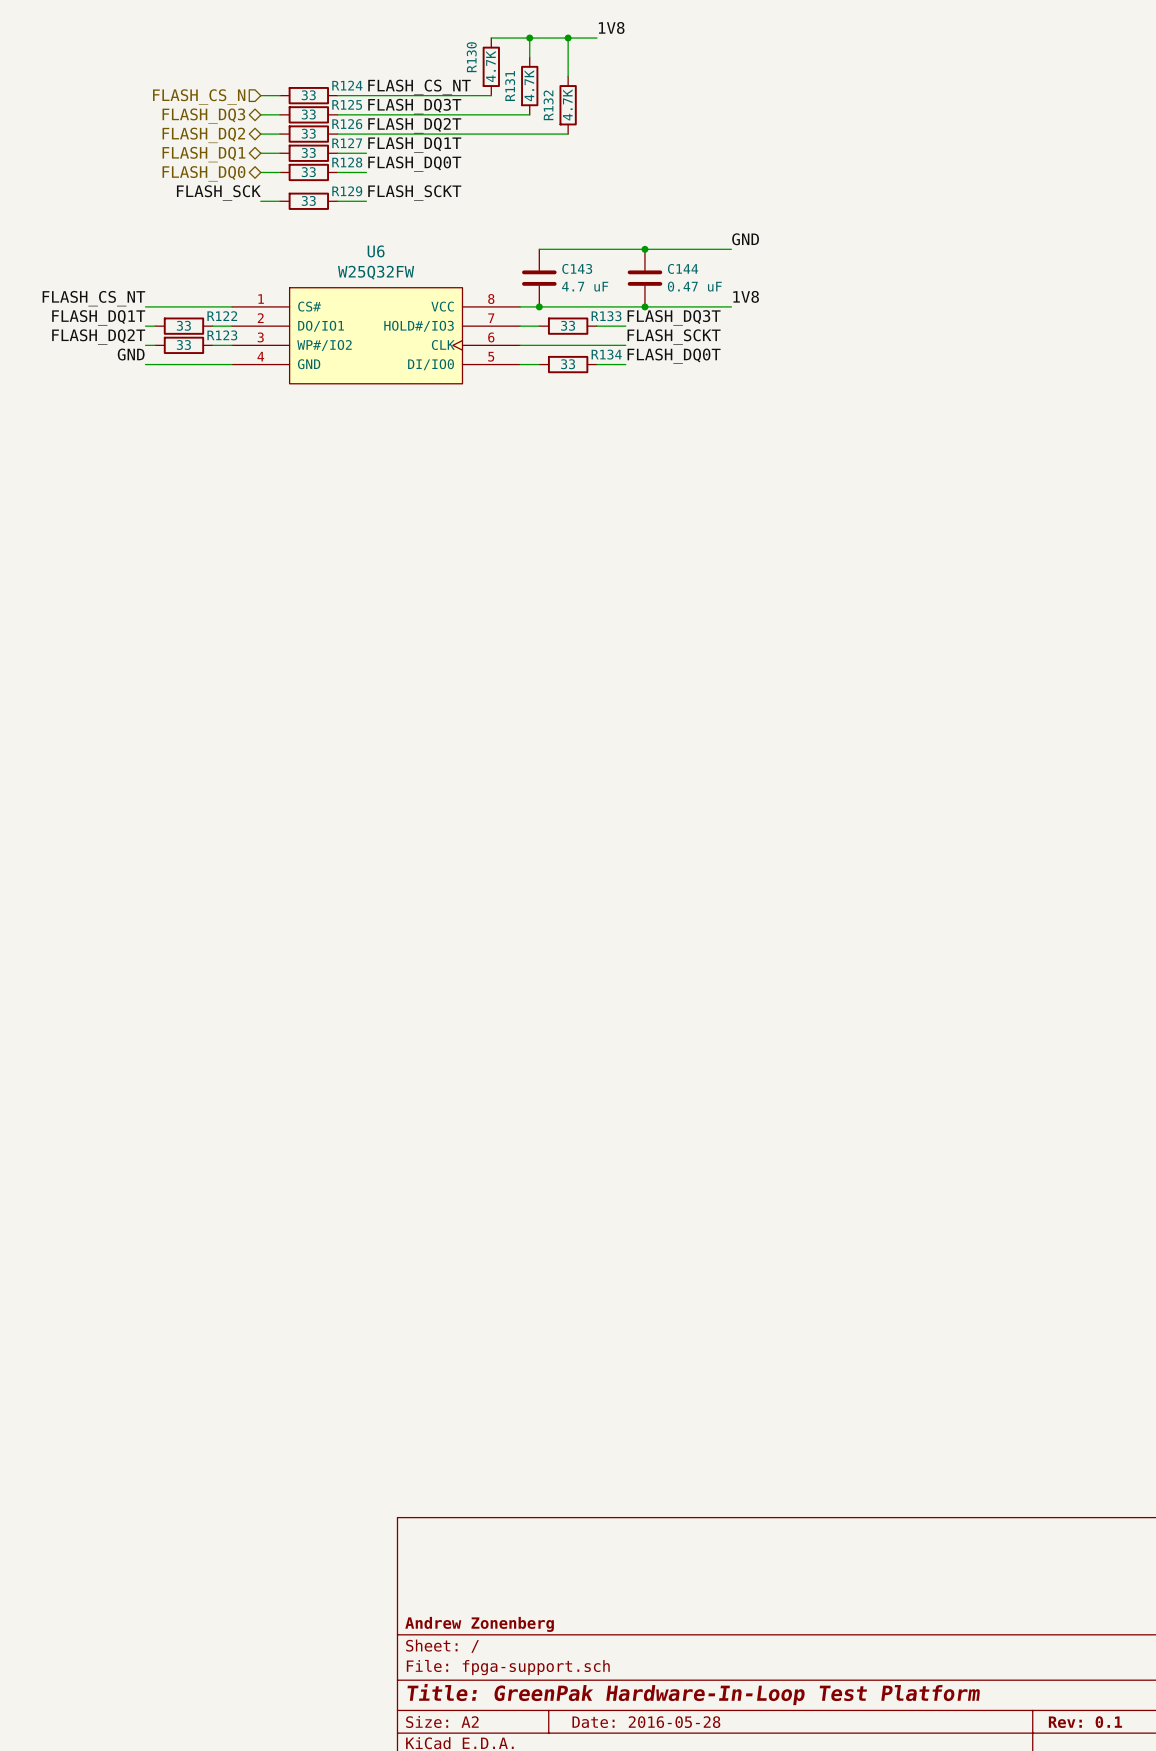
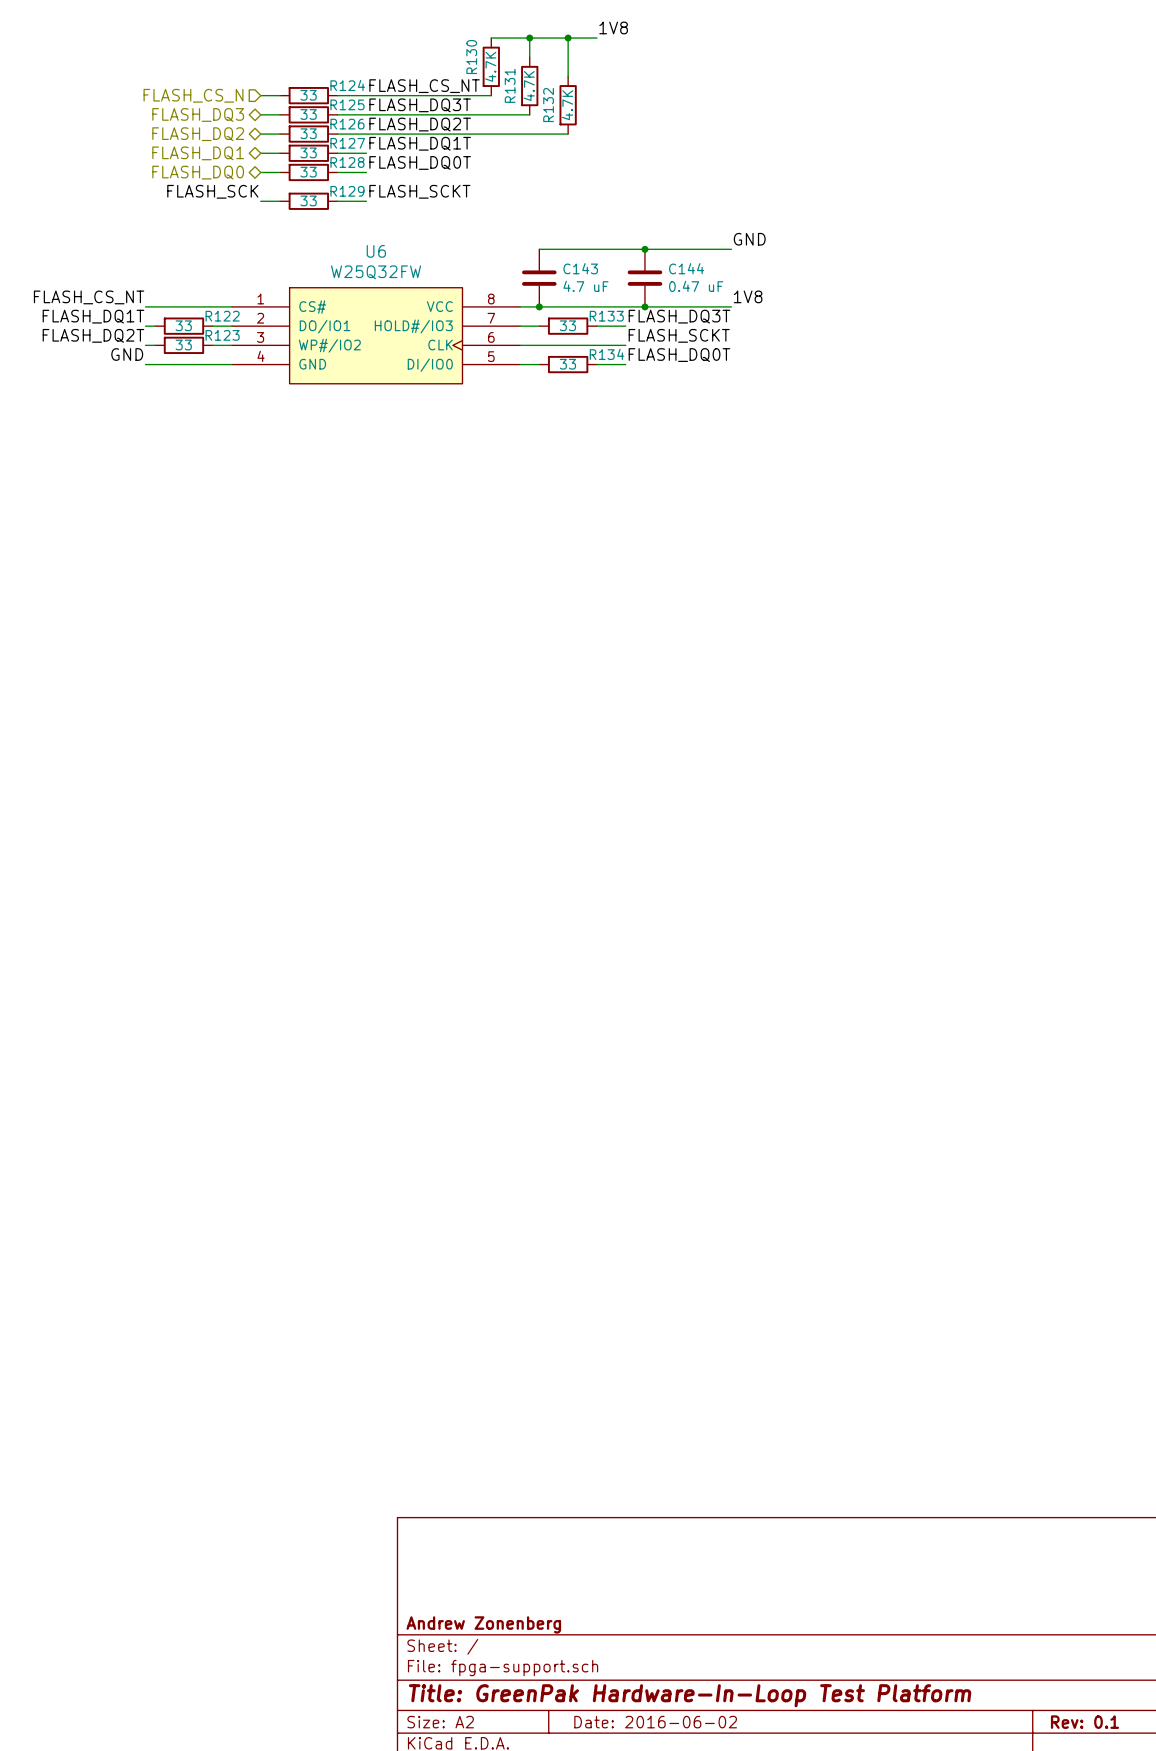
title block: Date: 2016-05-28 (646, 1722) -> Date: 2016-06-02 (655, 1722)

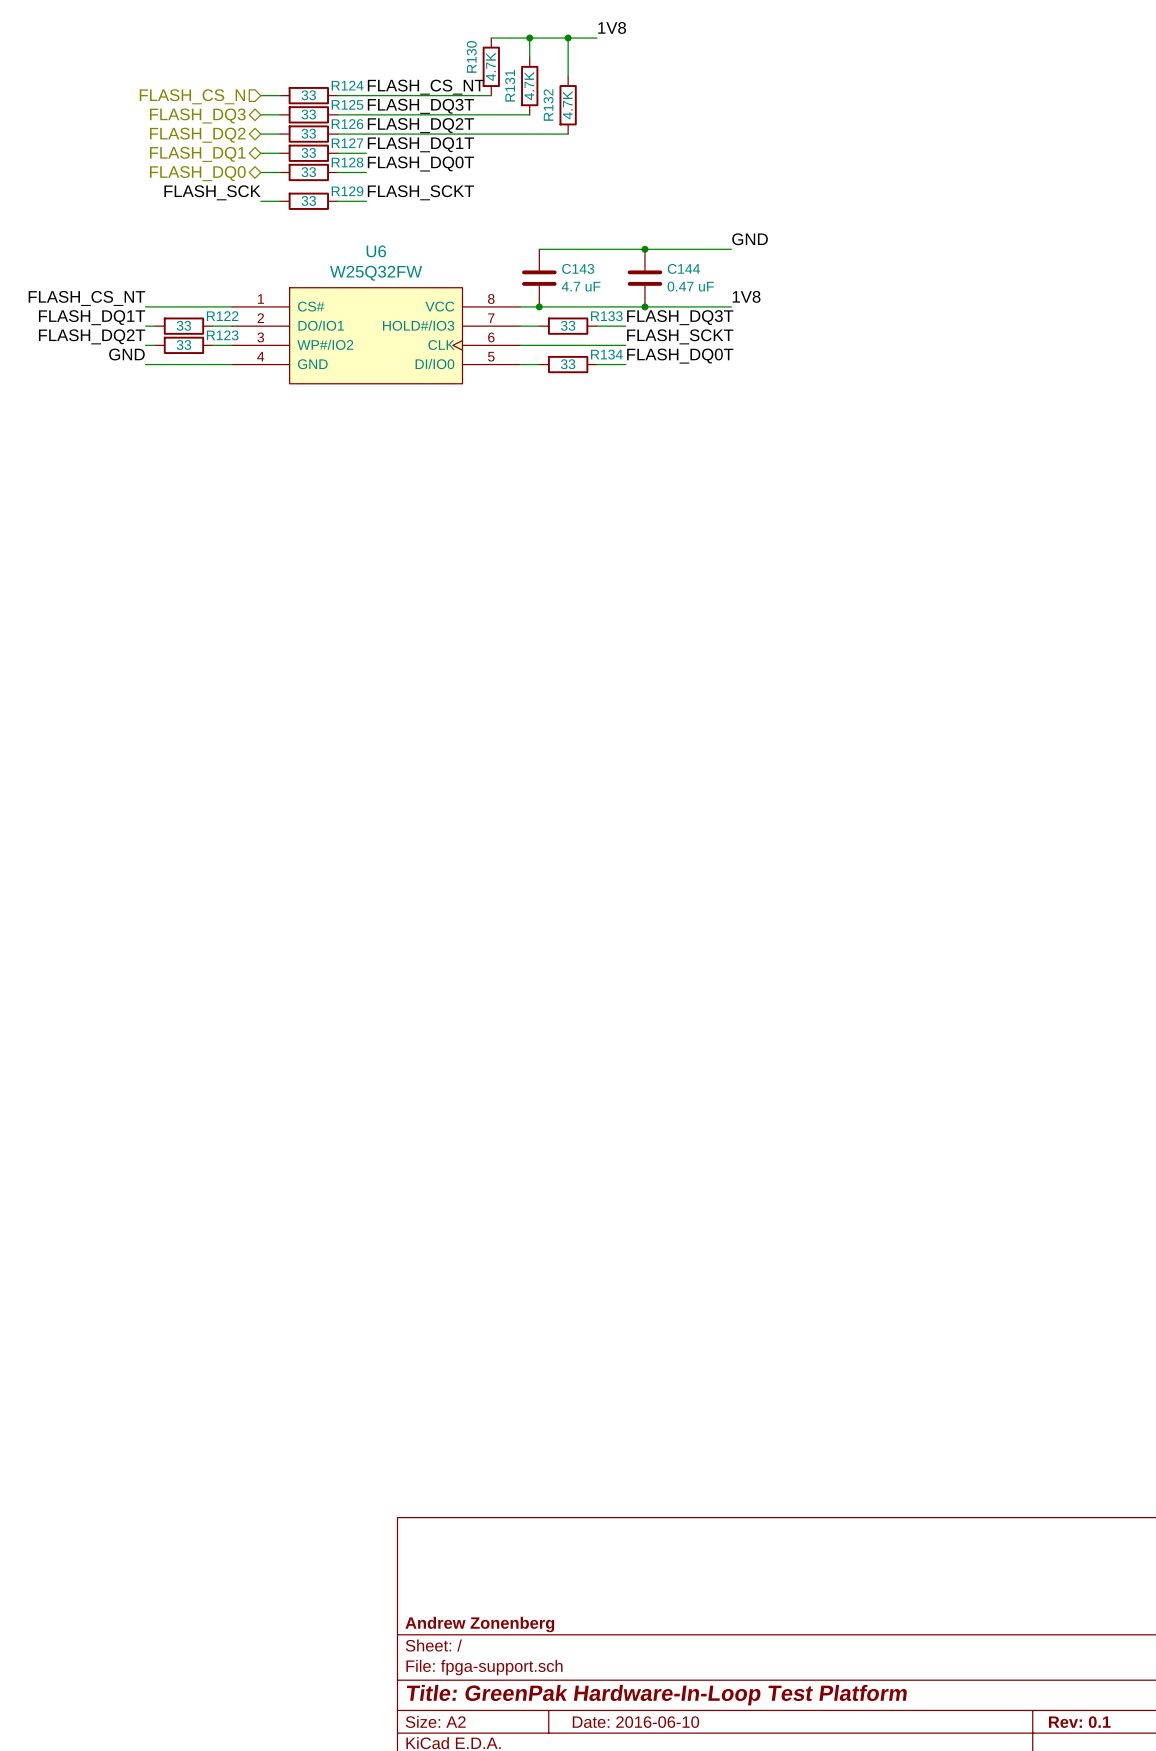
title block: Date: 2016-06-02 (655, 1722) -> Date: 2016-06-10 (635, 1722)

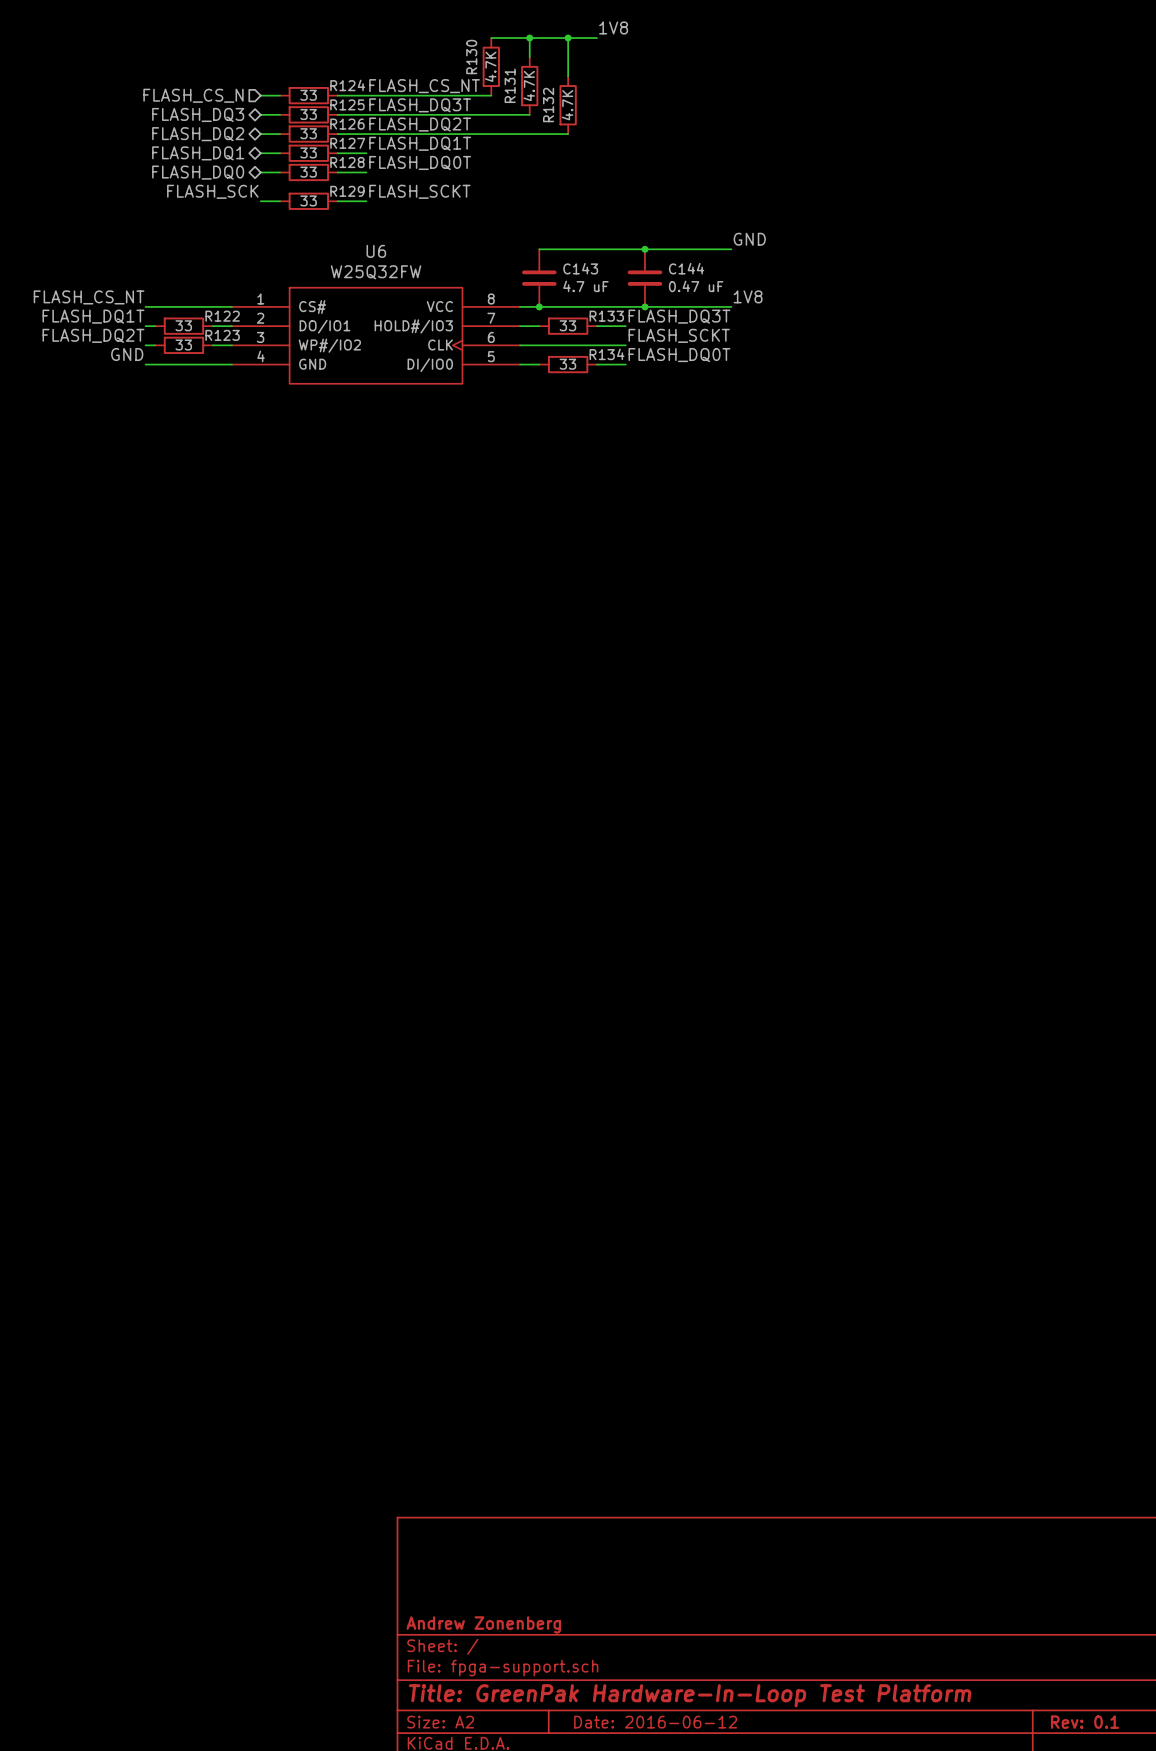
title block: Date: 2016-06-10 (635, 1722) -> Date: 2016-06-12 (655, 1722)

